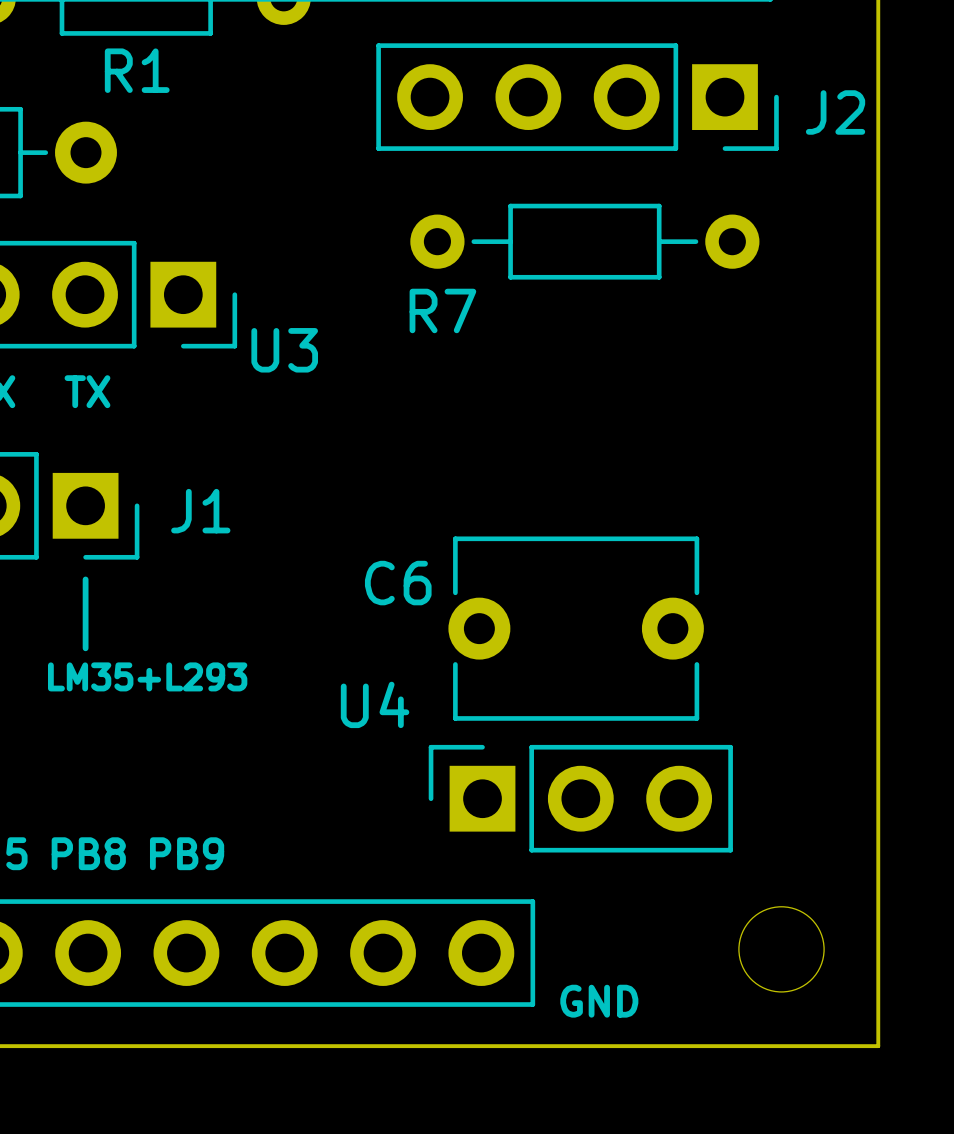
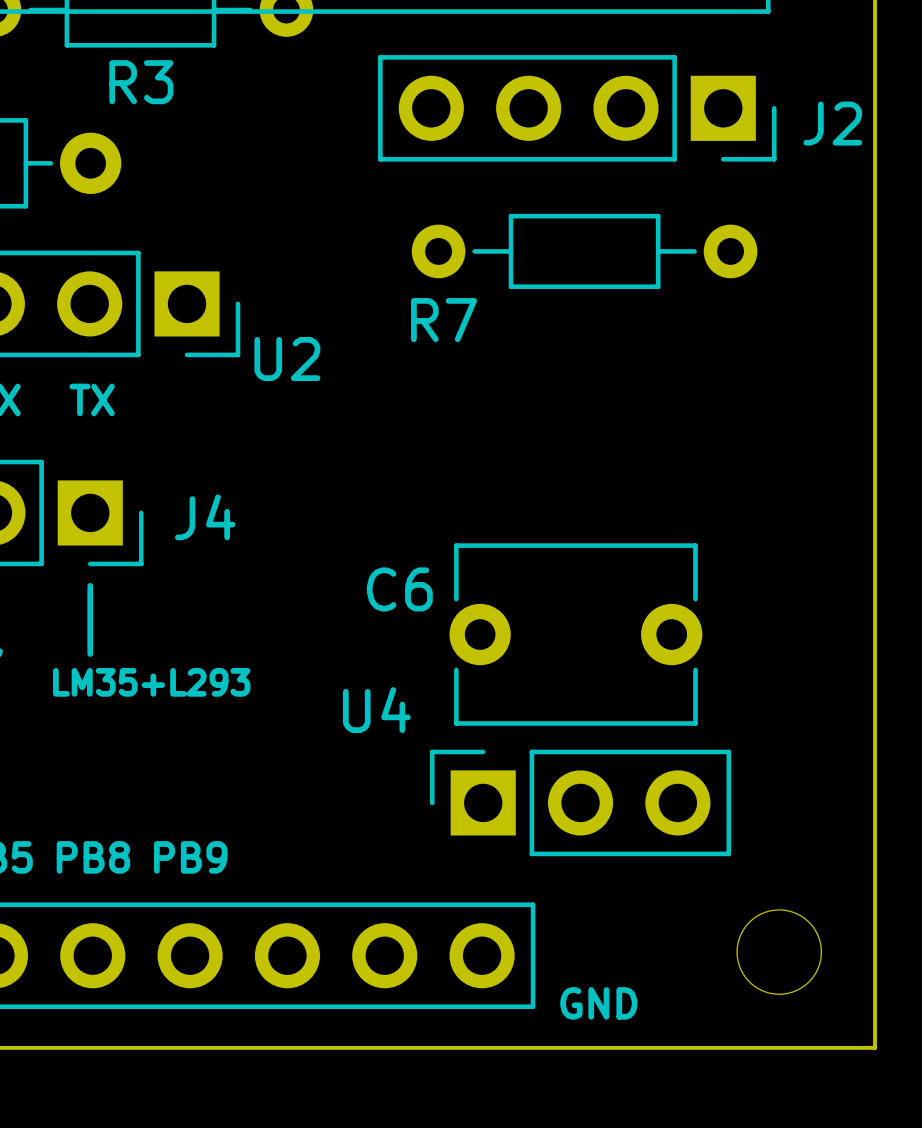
R1 name: R1 (137, 70) -> R3 (141, 82)
U3 name: U3 (284, 350) -> U2 (287, 358)
J1 name: J1 (200, 511) -> J4 (205, 517)

